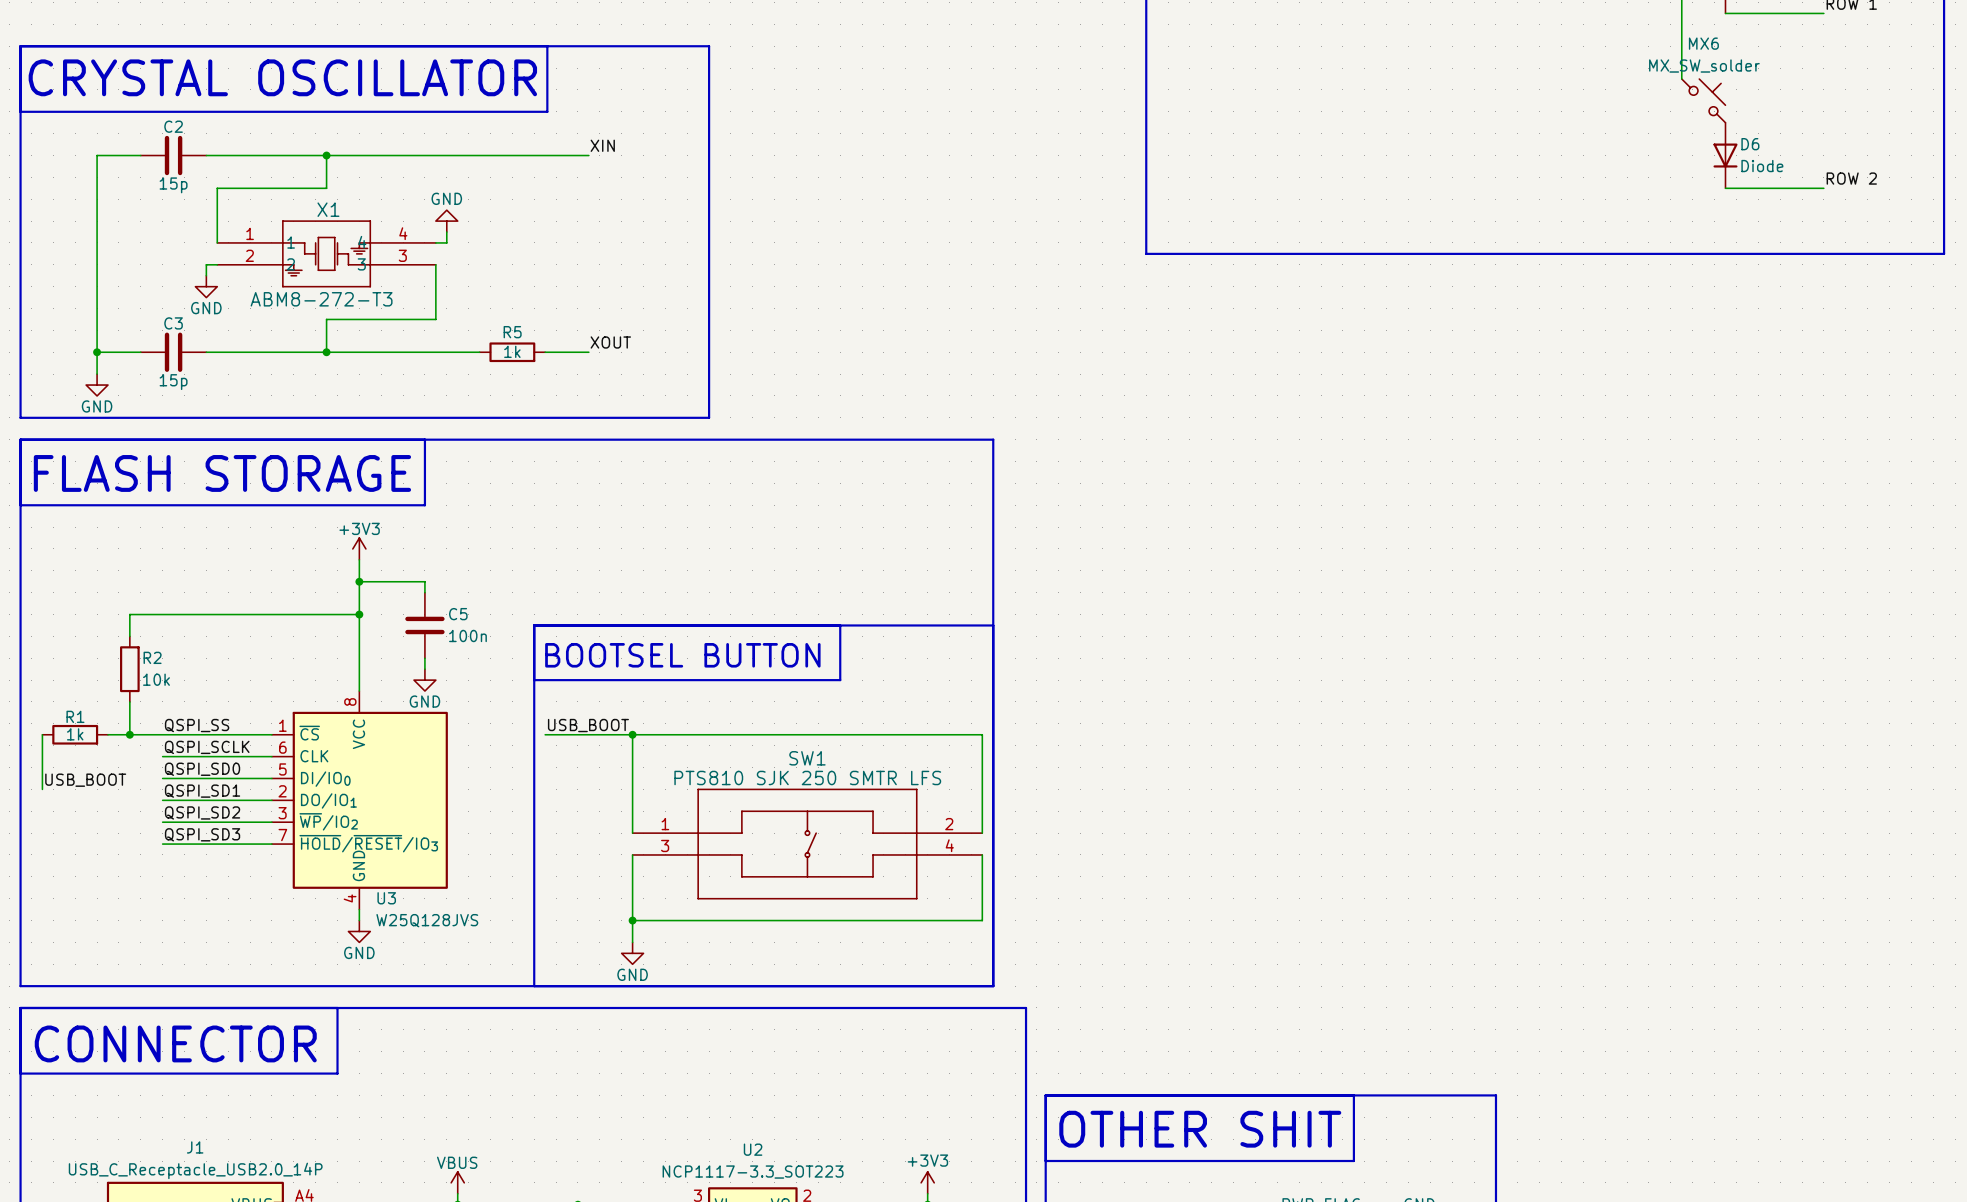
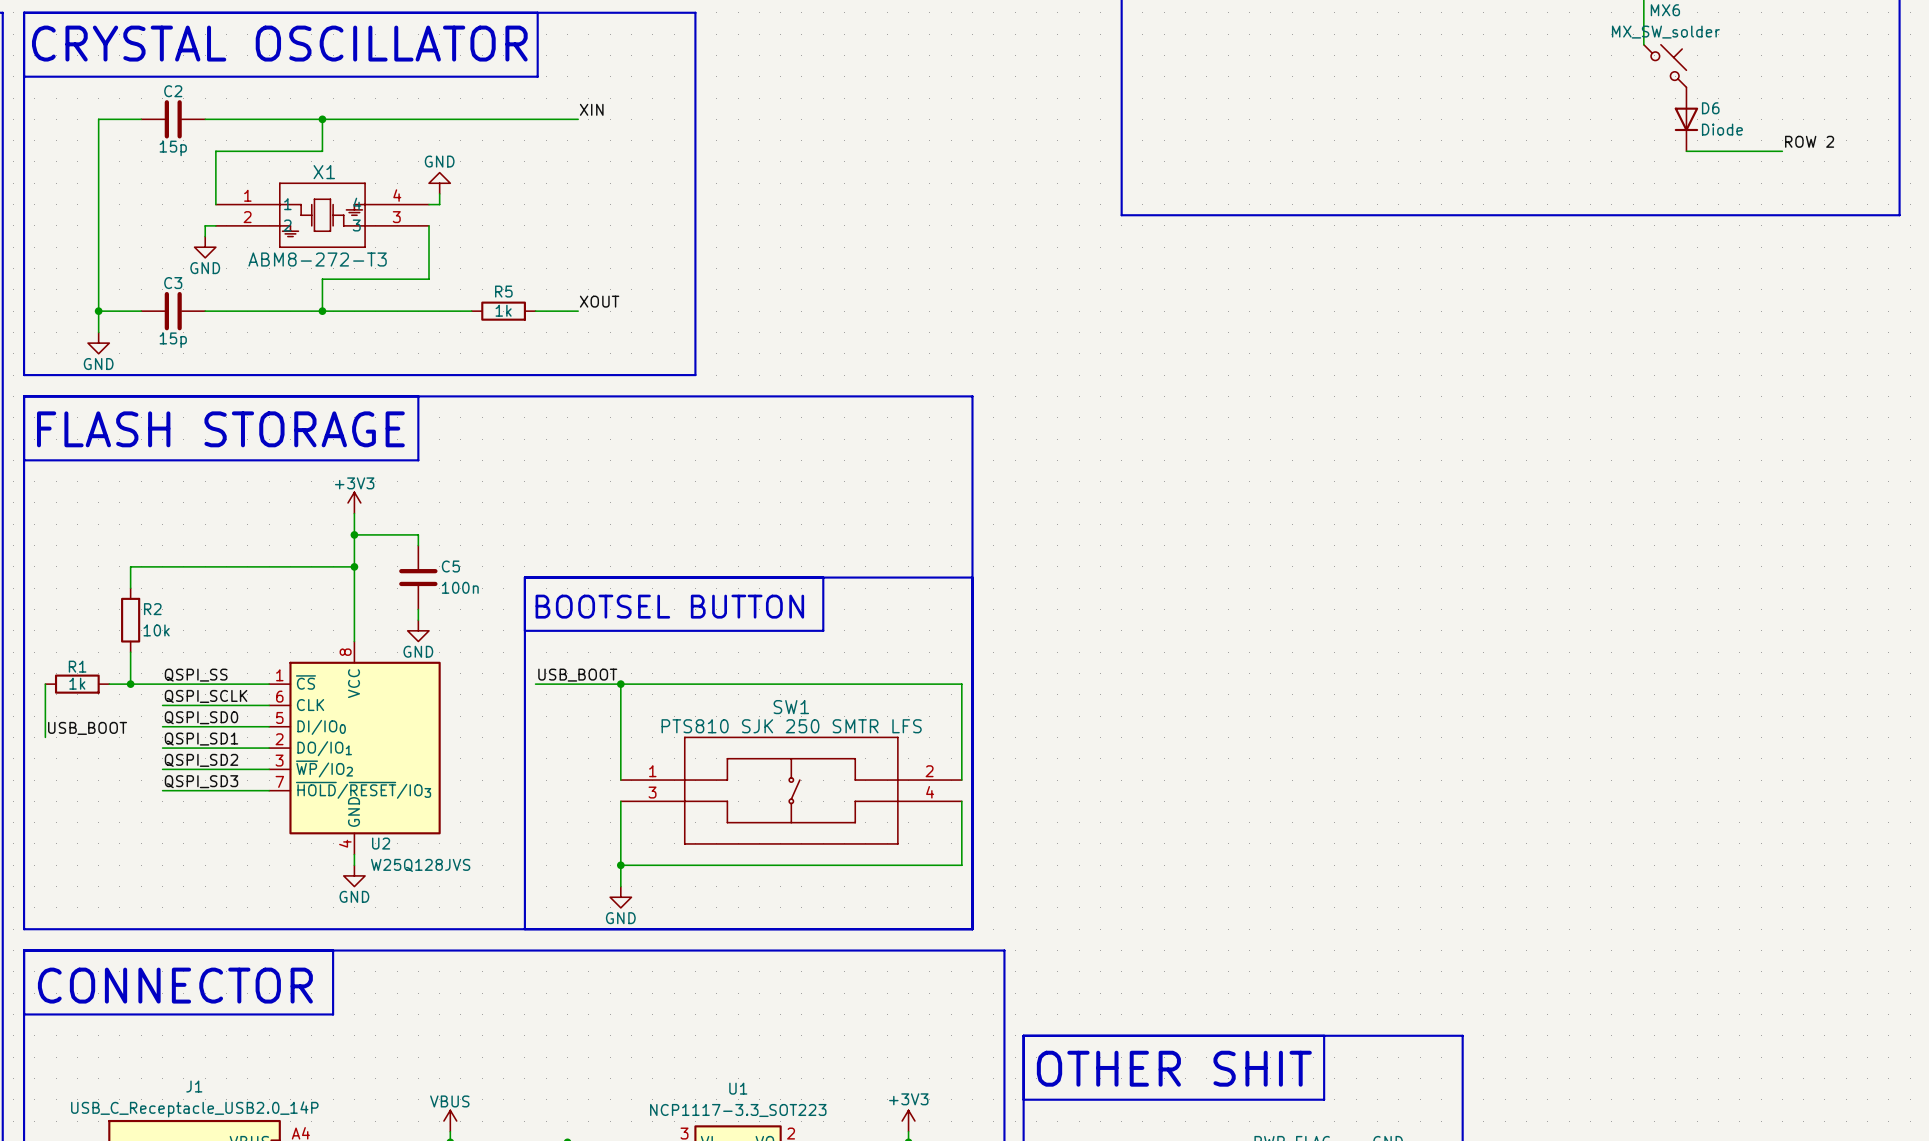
U3 name: U3 (386, 898) -> U2 (381, 843)
U2 name: U2 (753, 1149) -> U1 (738, 1088)

